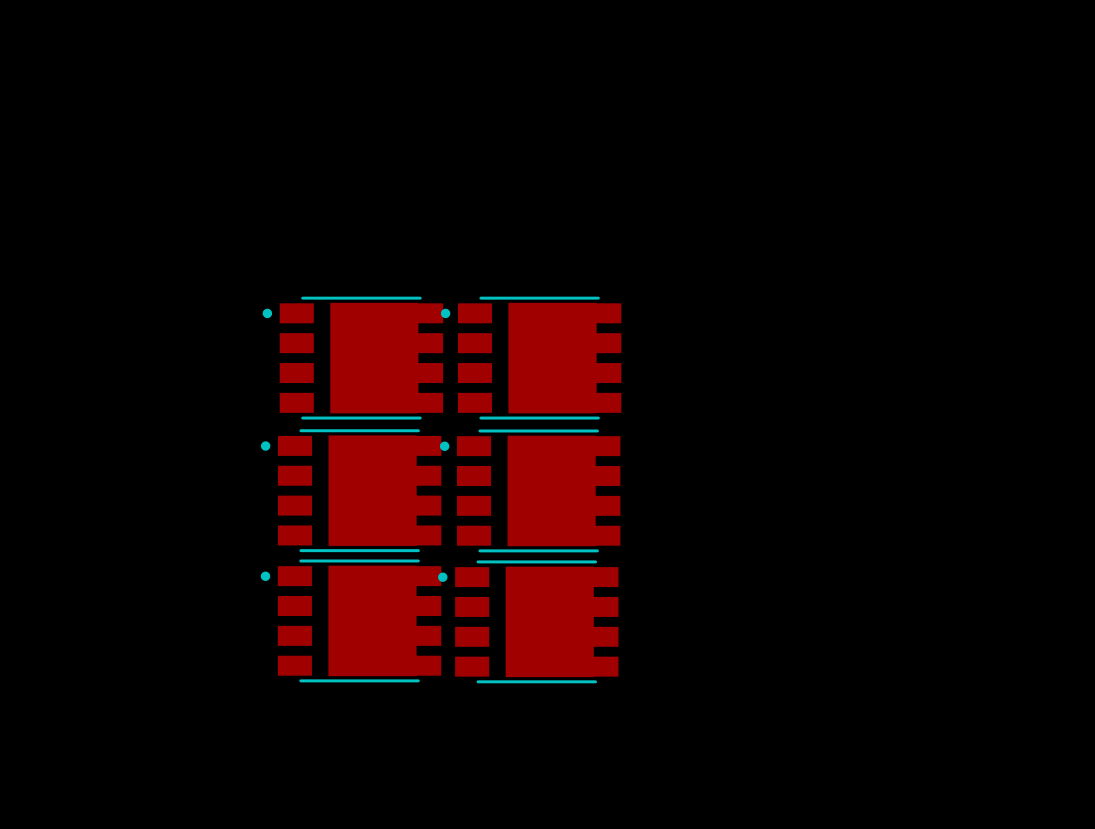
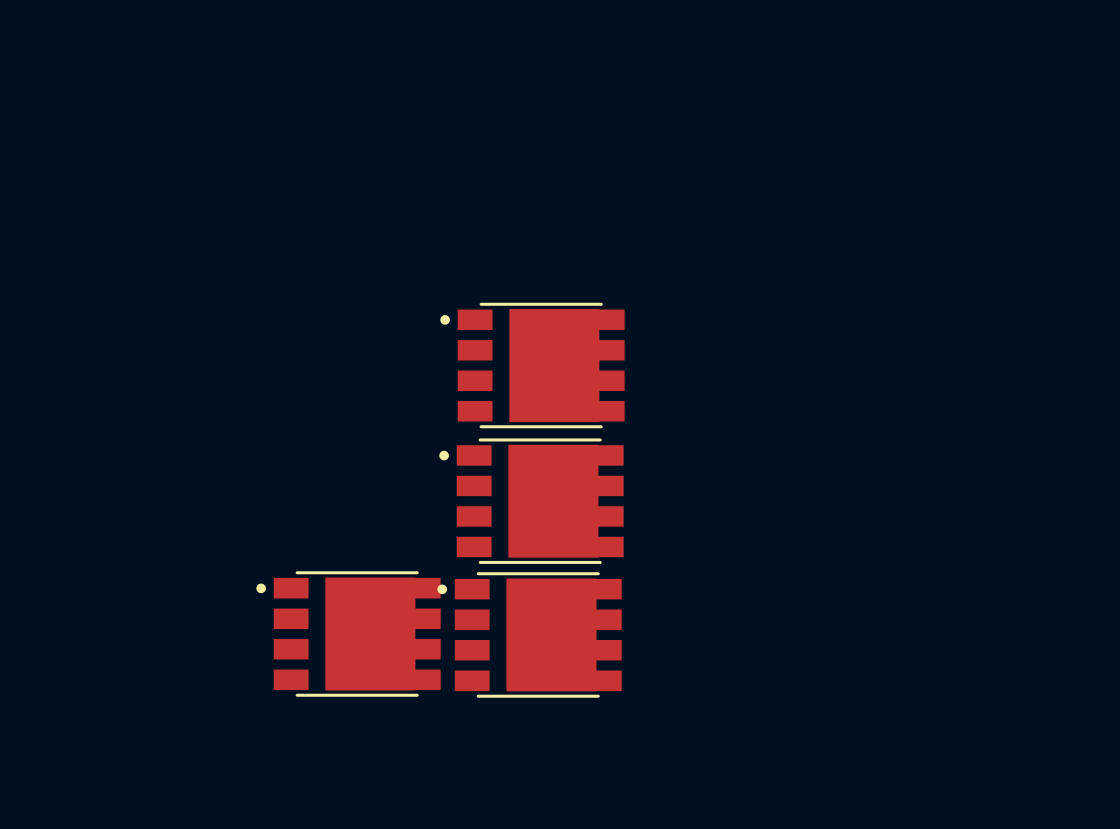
part: (352, 358) -> none
part: (351, 490) -> none

